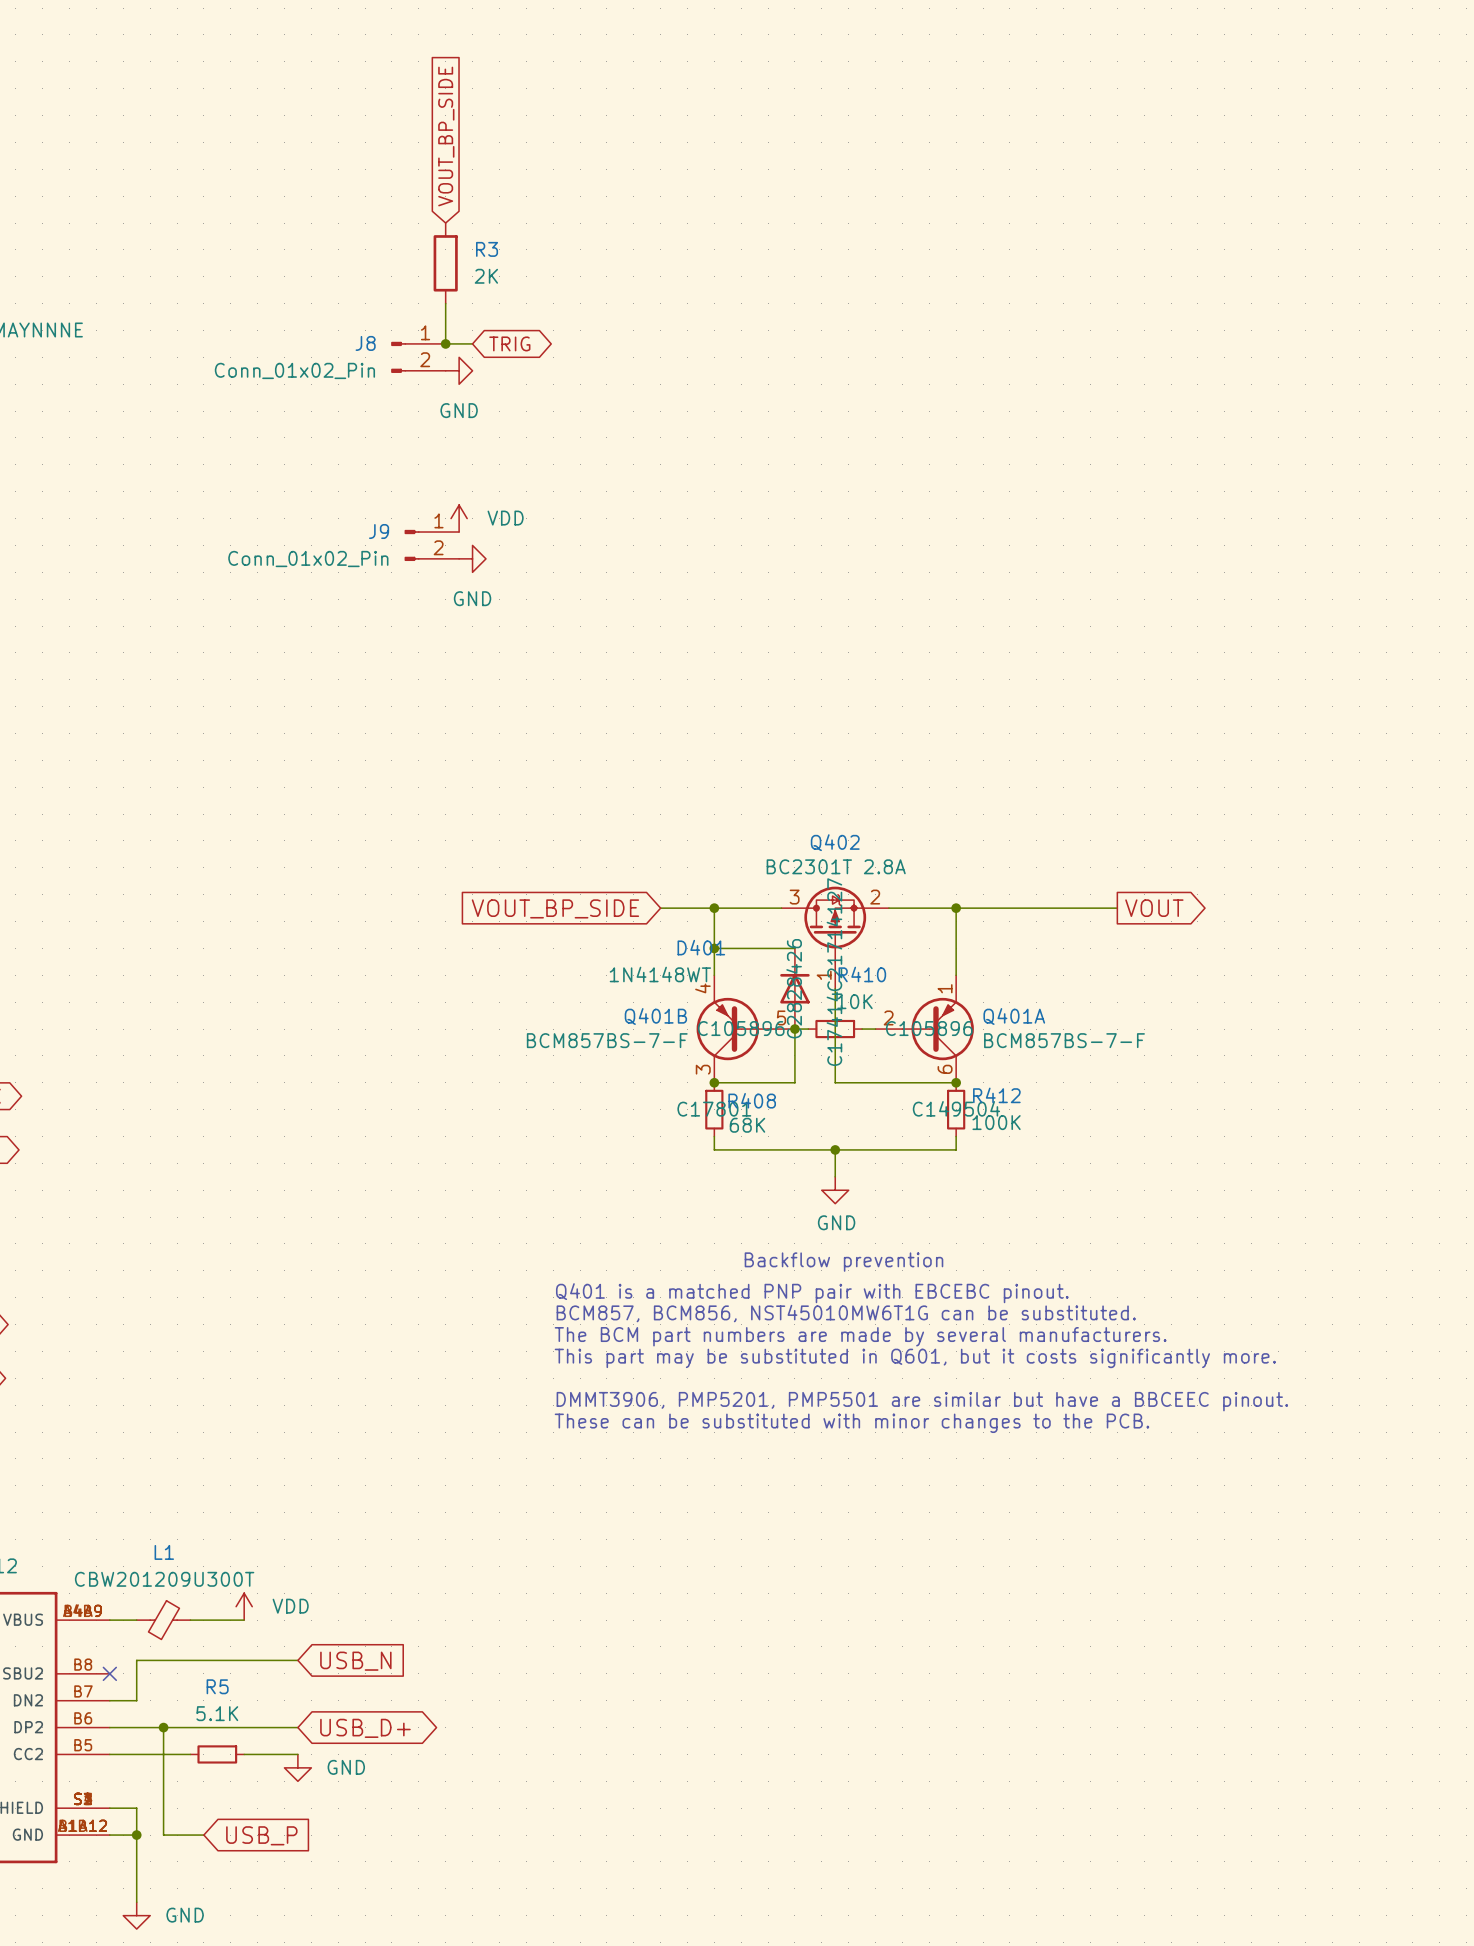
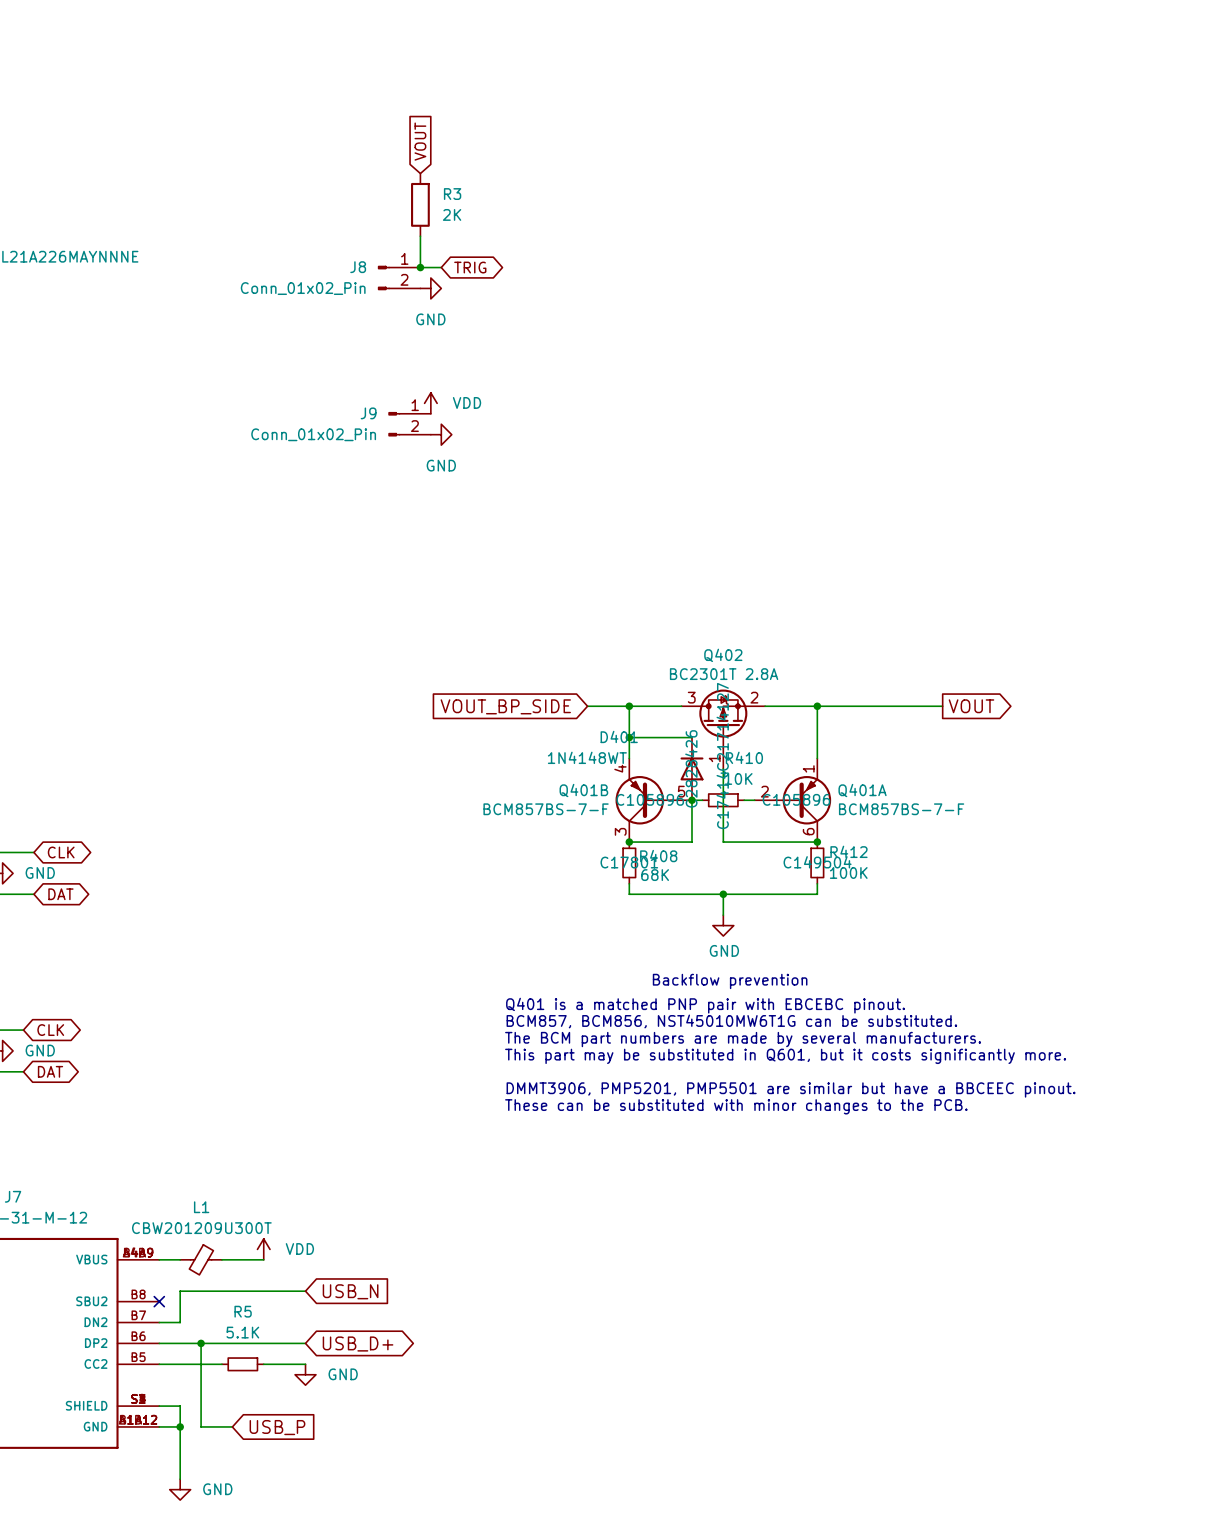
global label: VOUT_BP_SIDE (446, 136) -> VOUT (420, 141)

